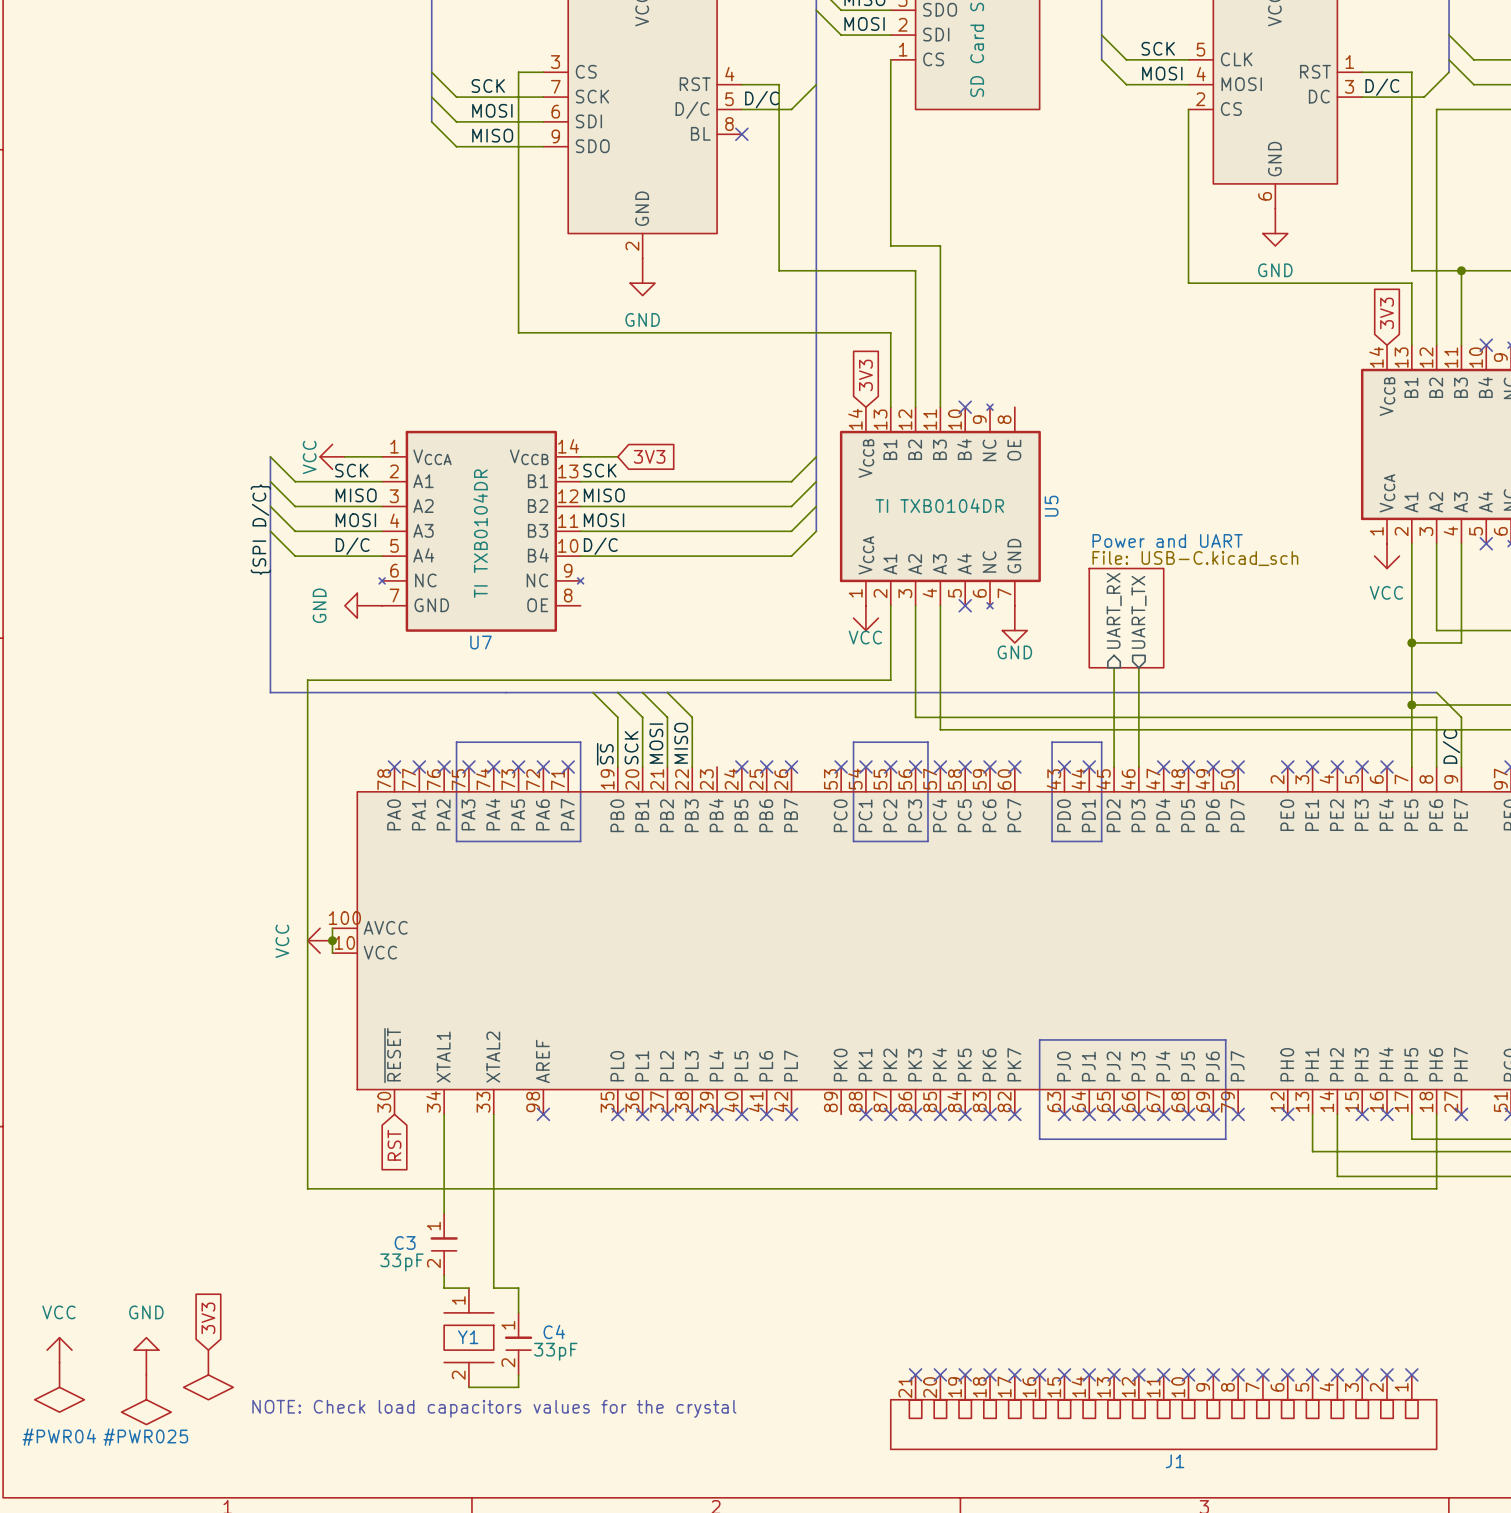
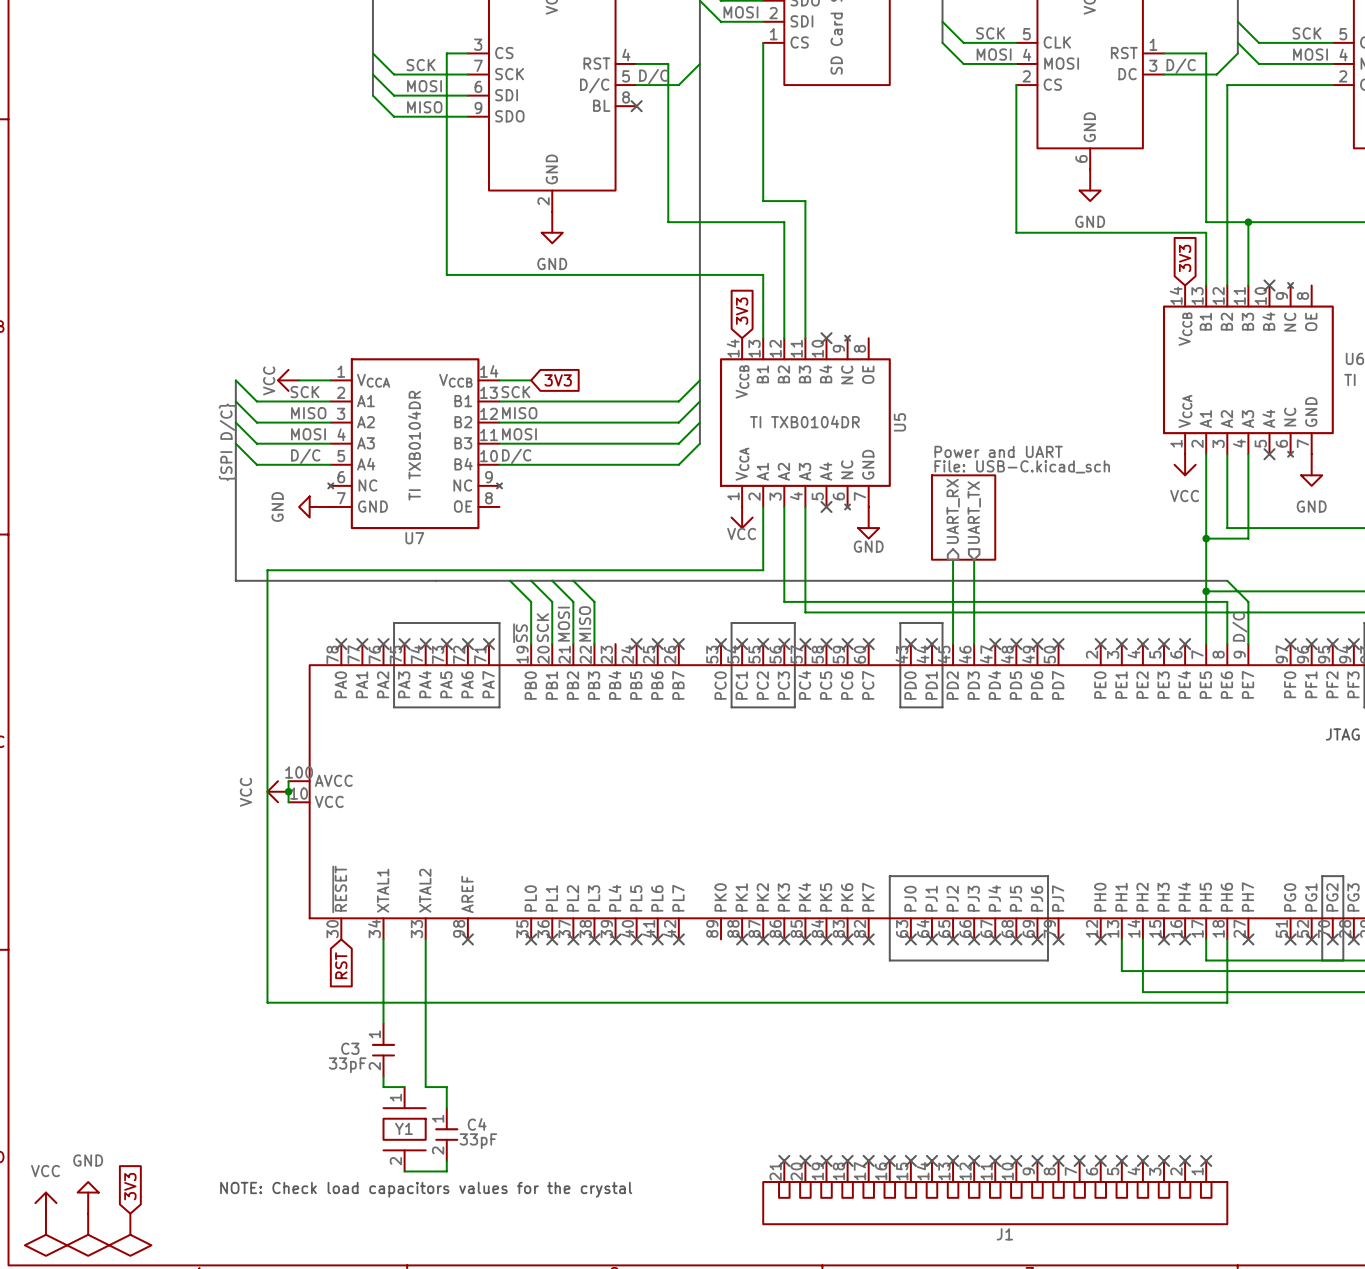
global label position: 3V3 (208, 1318) -> 3V3 (130, 1186)
power symbol position: VCC (59, 1350) -> VCC (45, 1203)
power symbol position: GND (146, 1356) -> GND (88, 1197)
power symbol: (208, 1374) -> none
#PWR04: (59, 1387) -> none
#PWR025: (146, 1399) -> none
power symbol: none -> (45, 1234)
power symbol: none -> (88, 1234)
power symbol: none -> (130, 1234)

